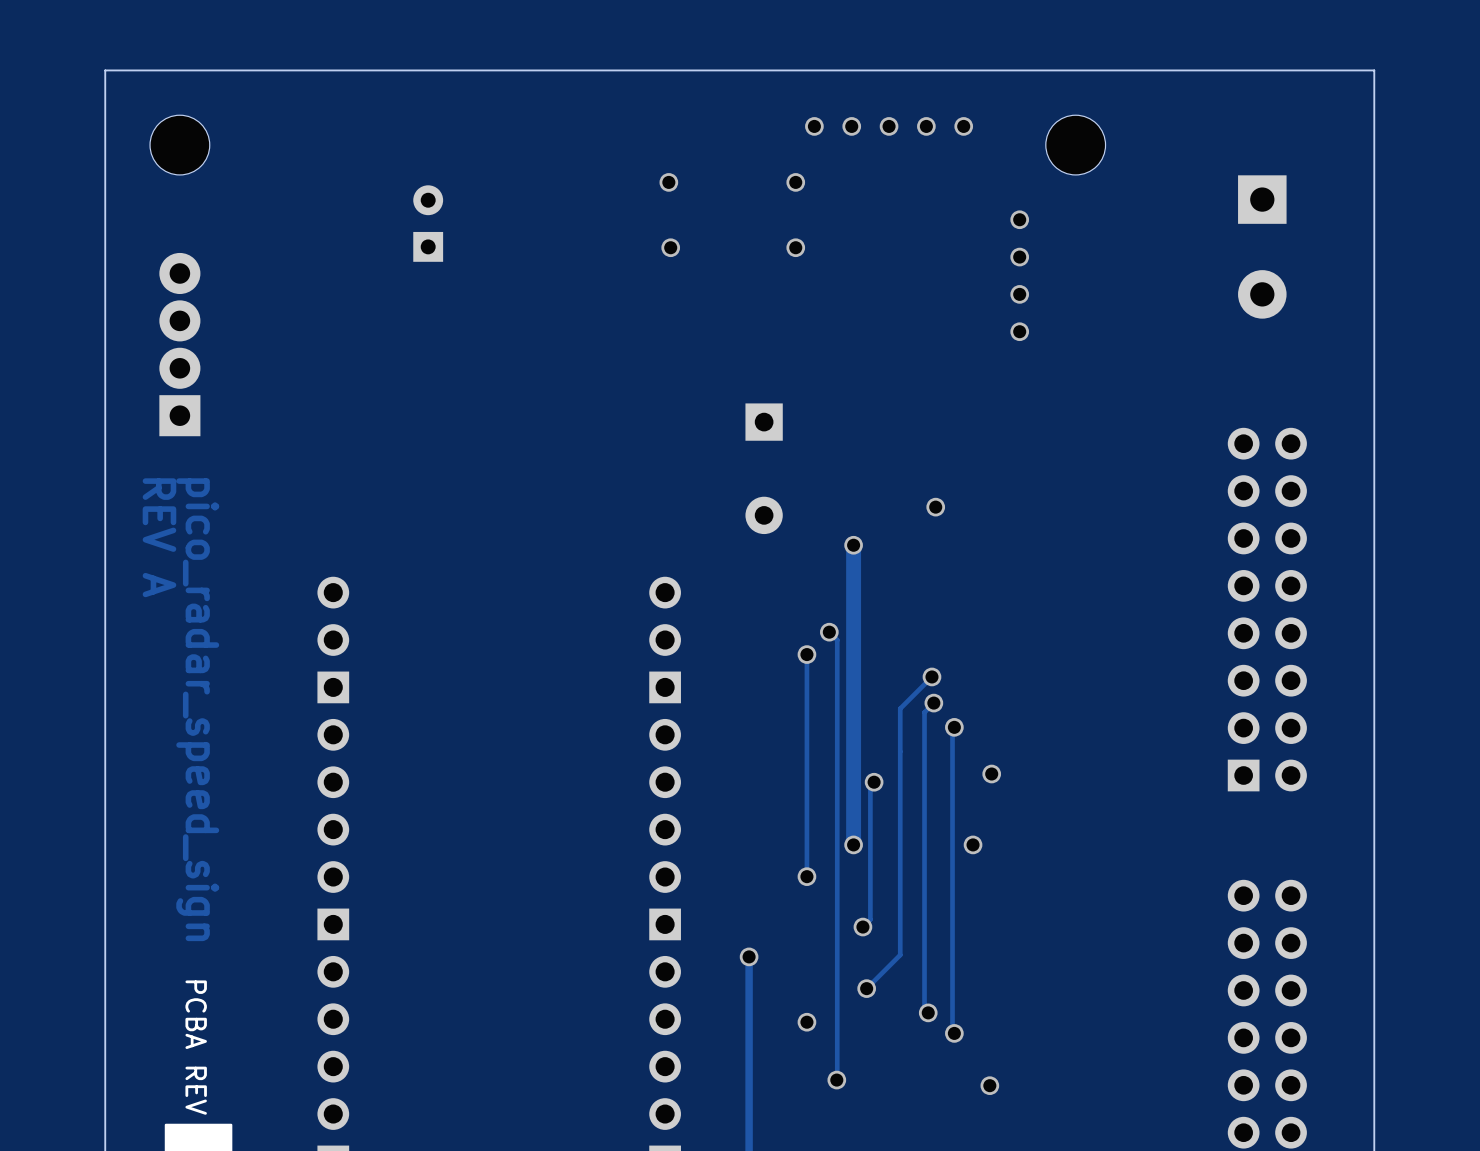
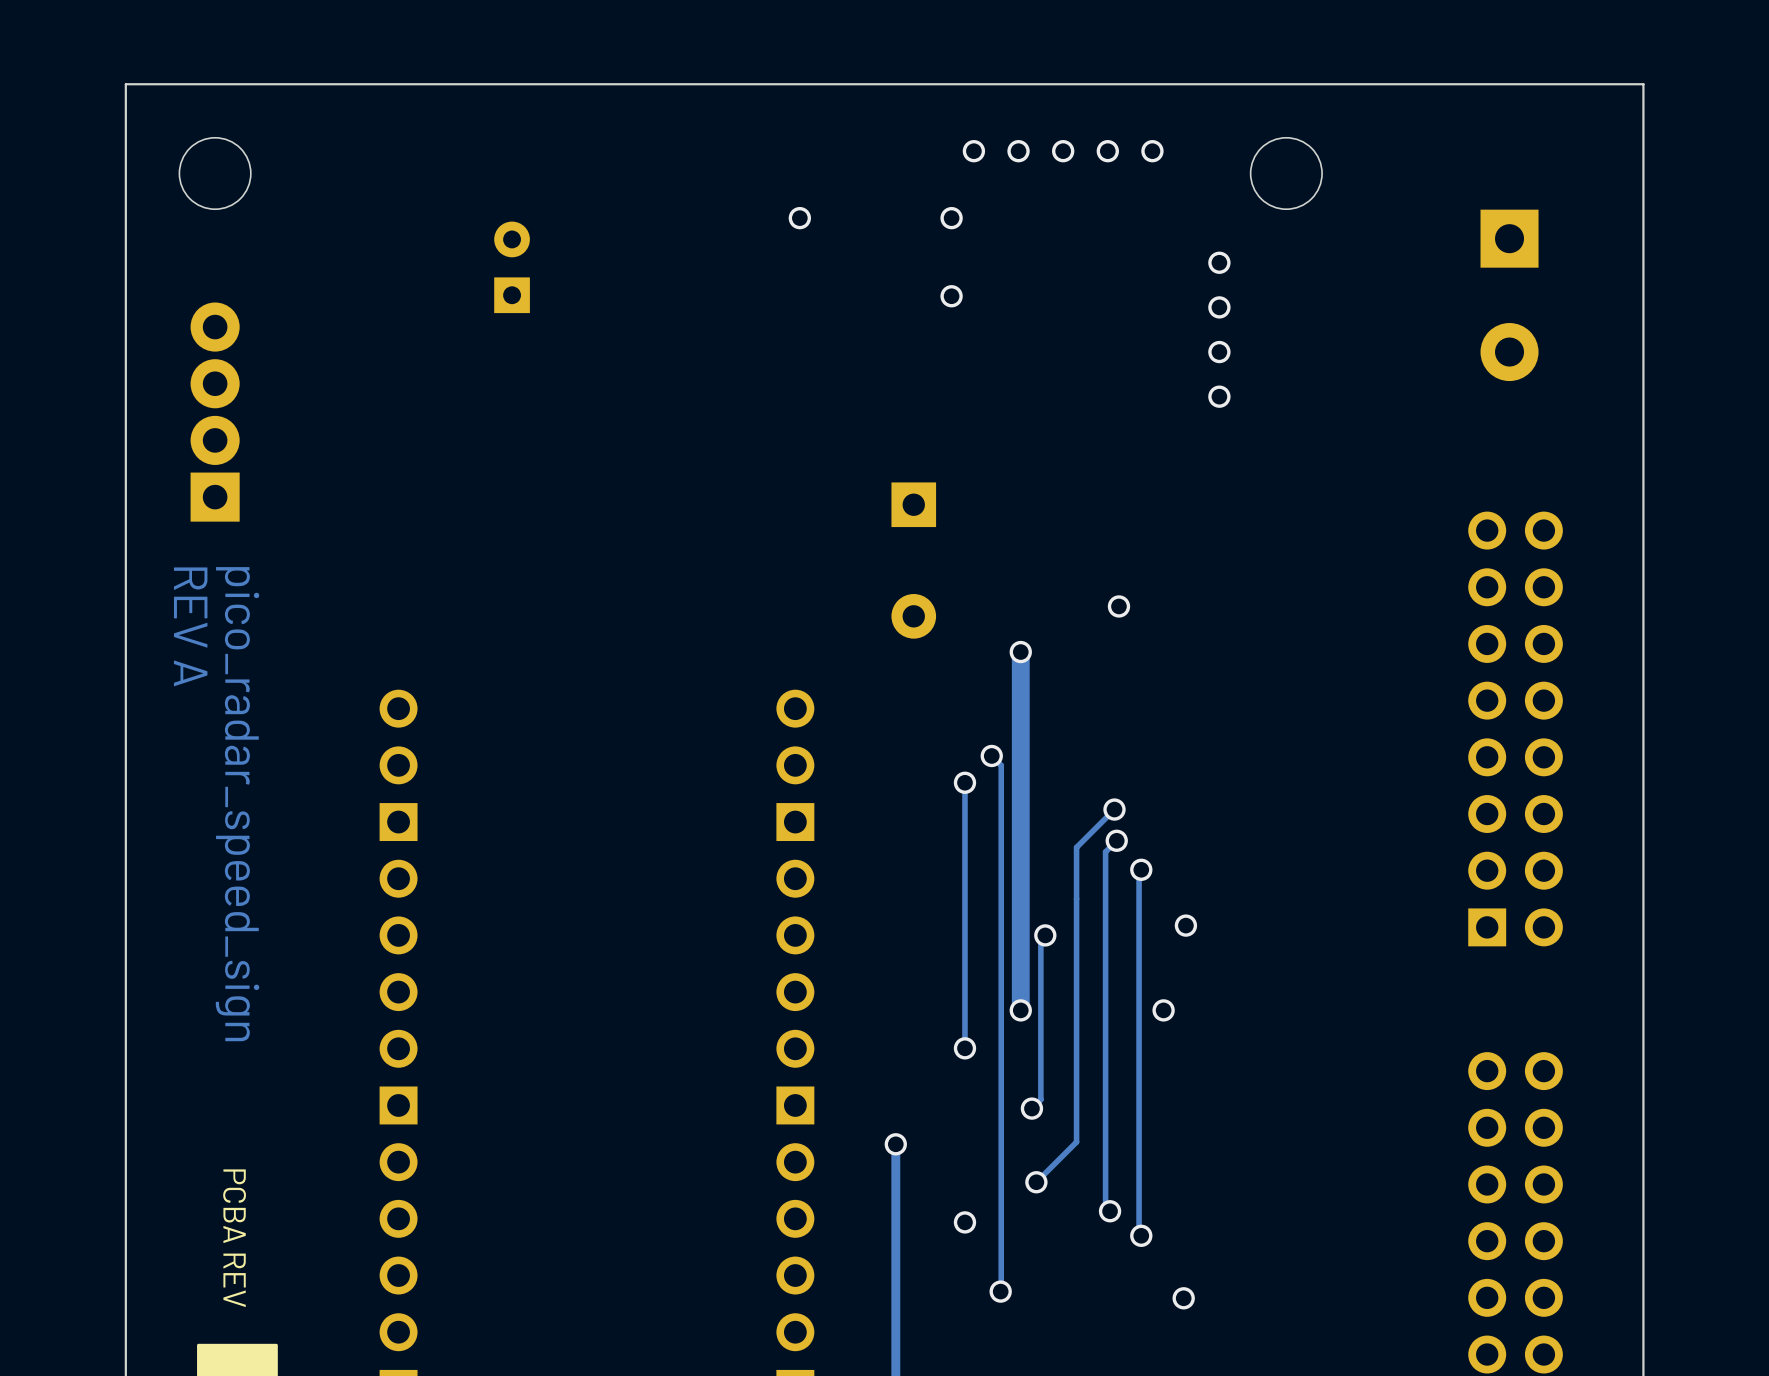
via: (670, 247) -> none

